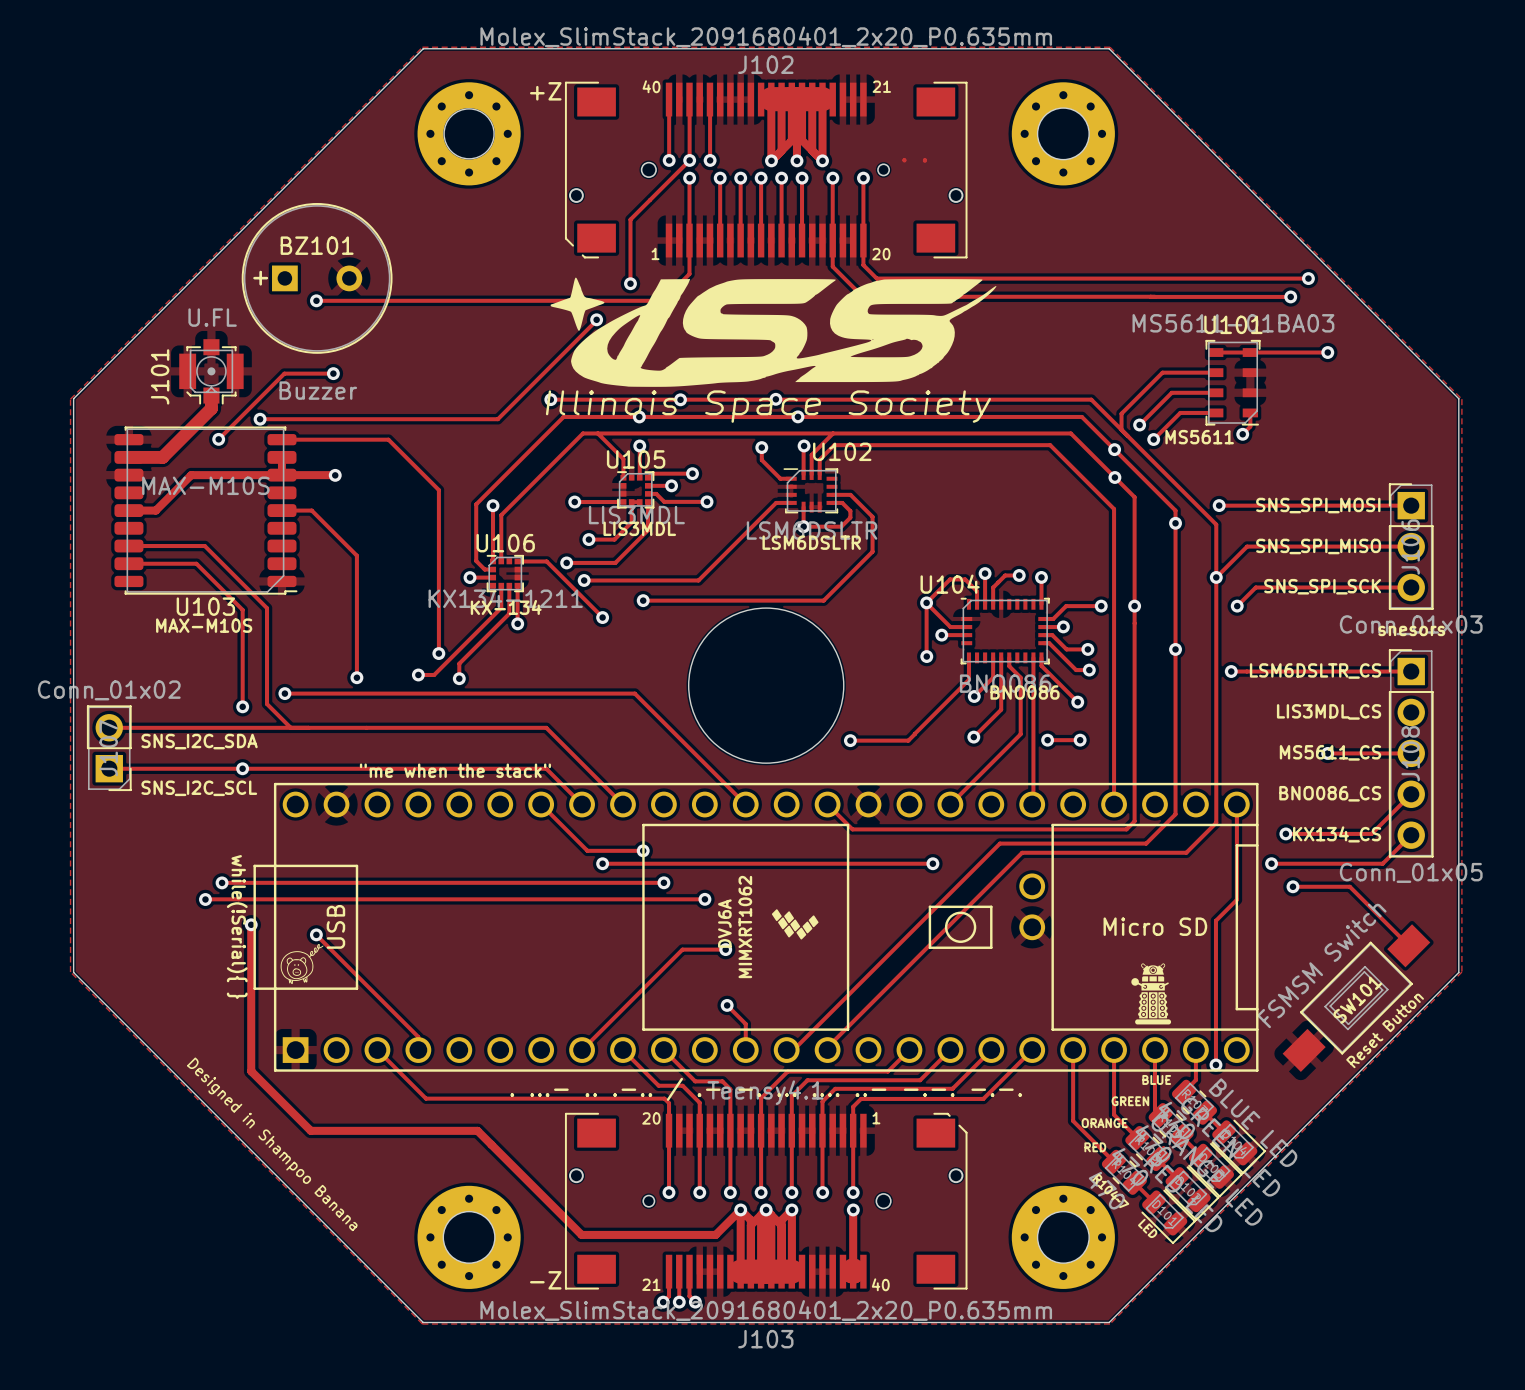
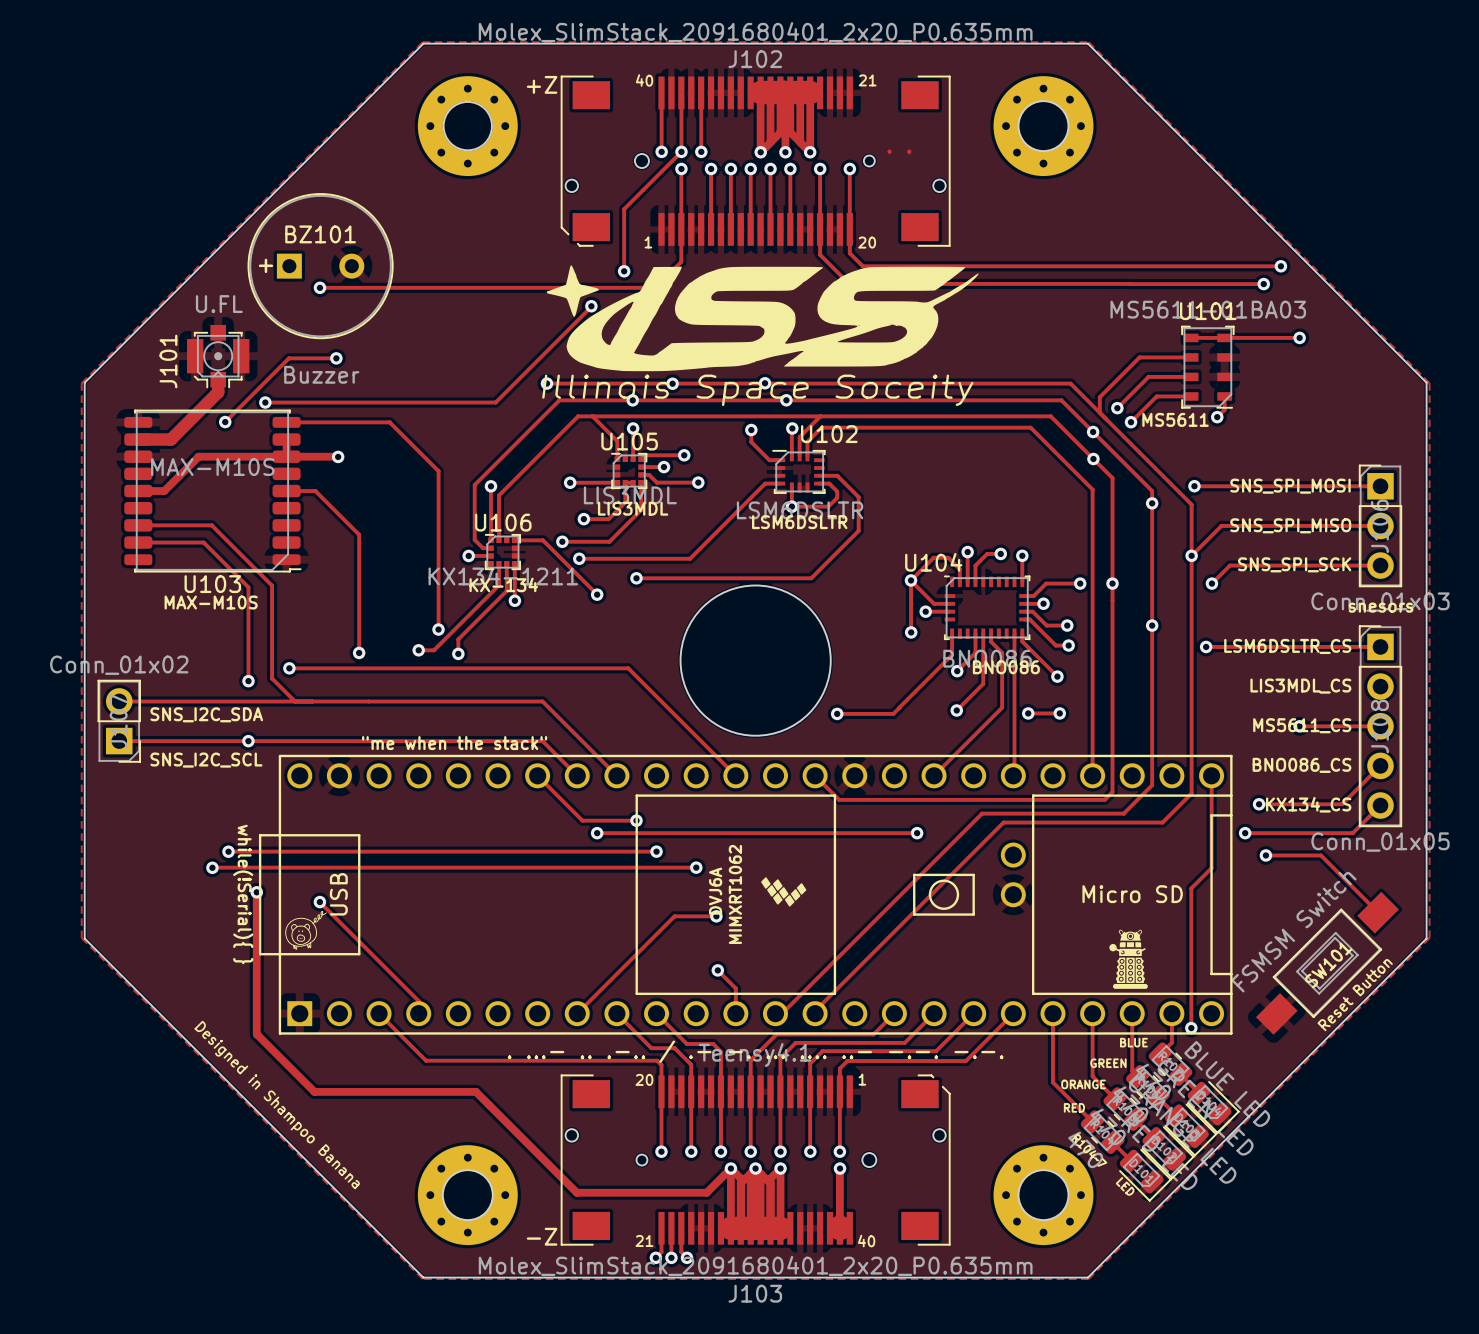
text: Illinois Space Society (768, 406) -> Illinois Space Soceity (757, 390)

